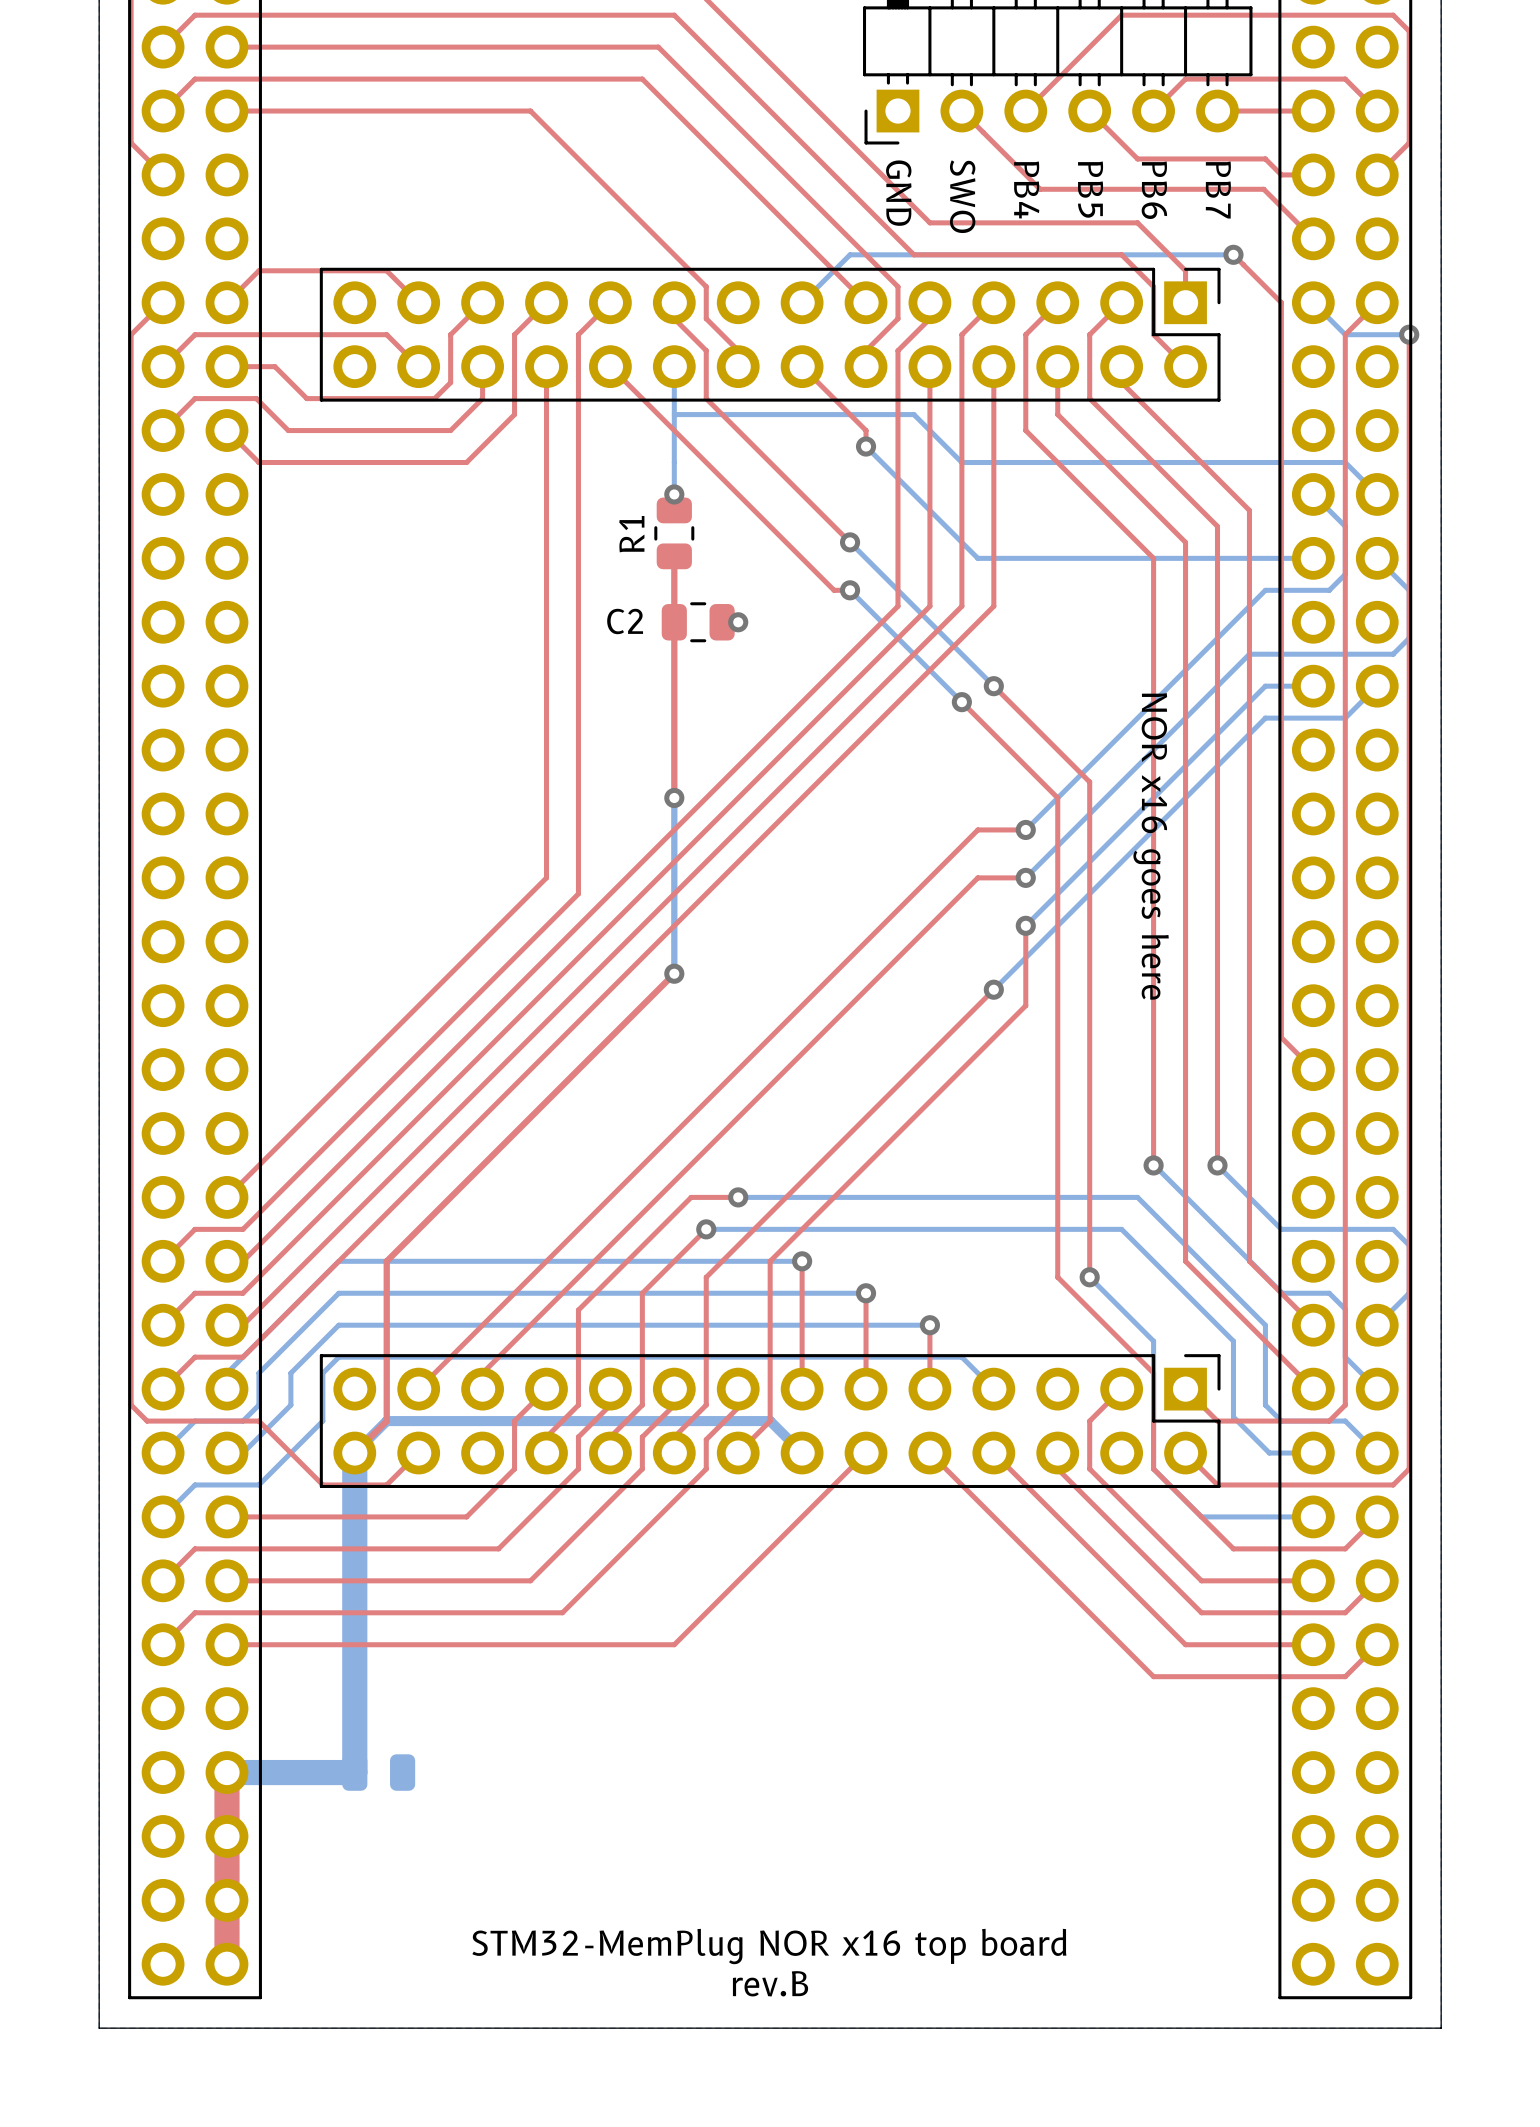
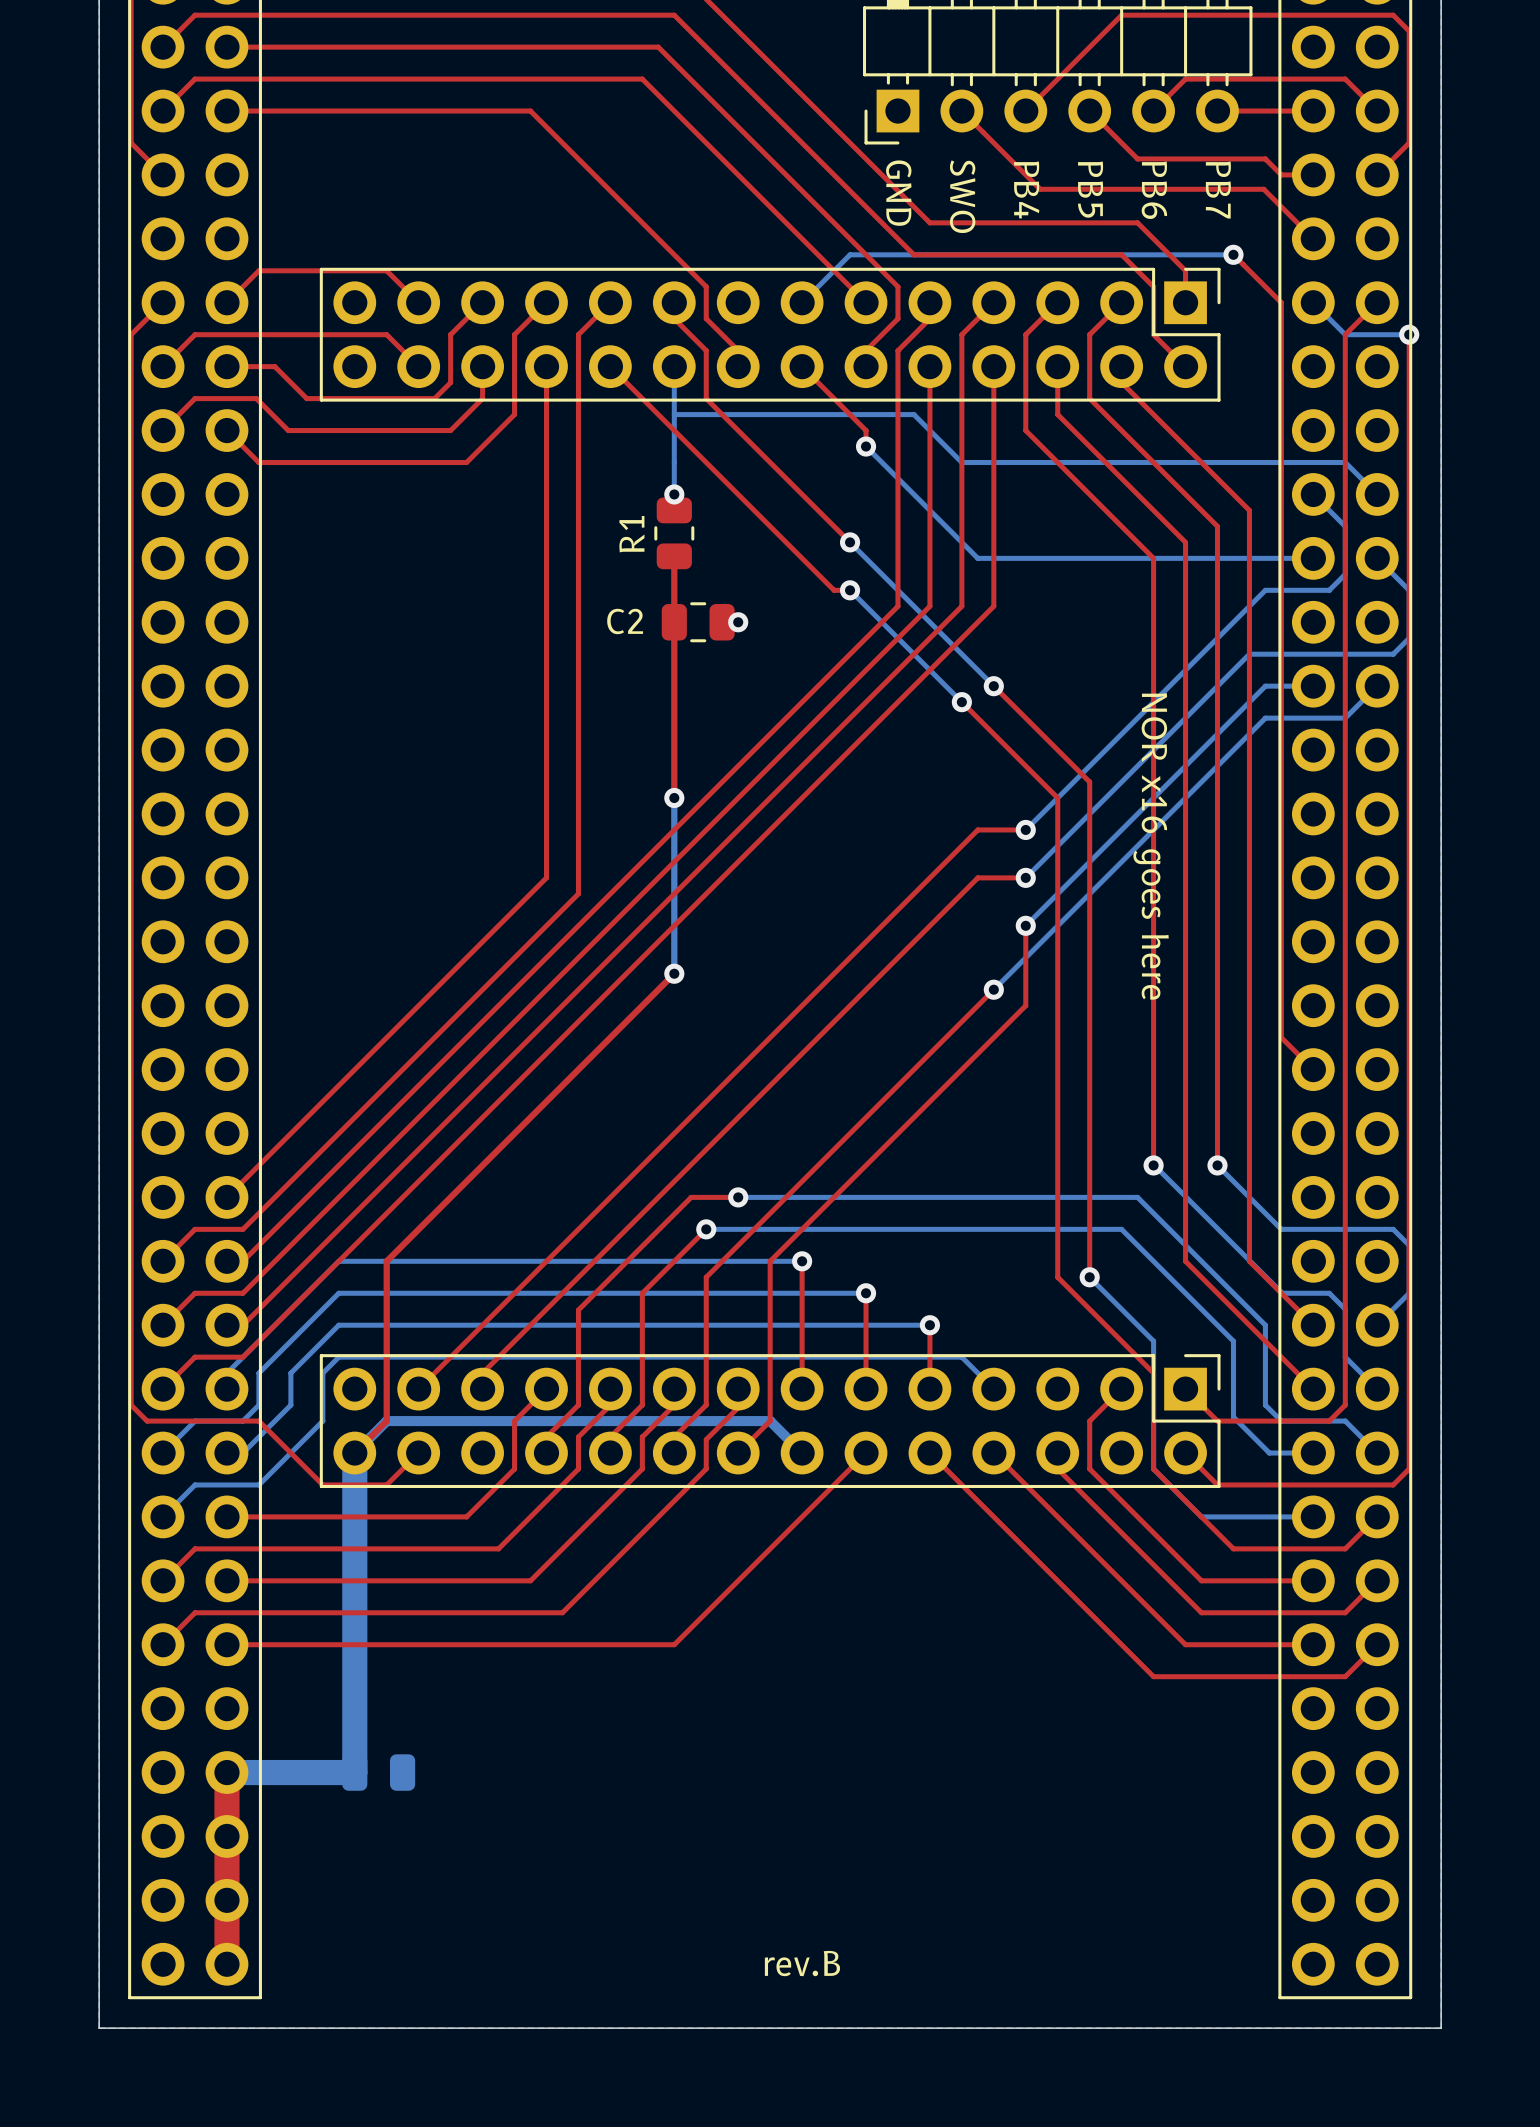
text: STM32-MemPlug NOR x16 top board (769, 1946) -> none
text position: rev.B (770, 1983) -> rev.B (802, 1963)

